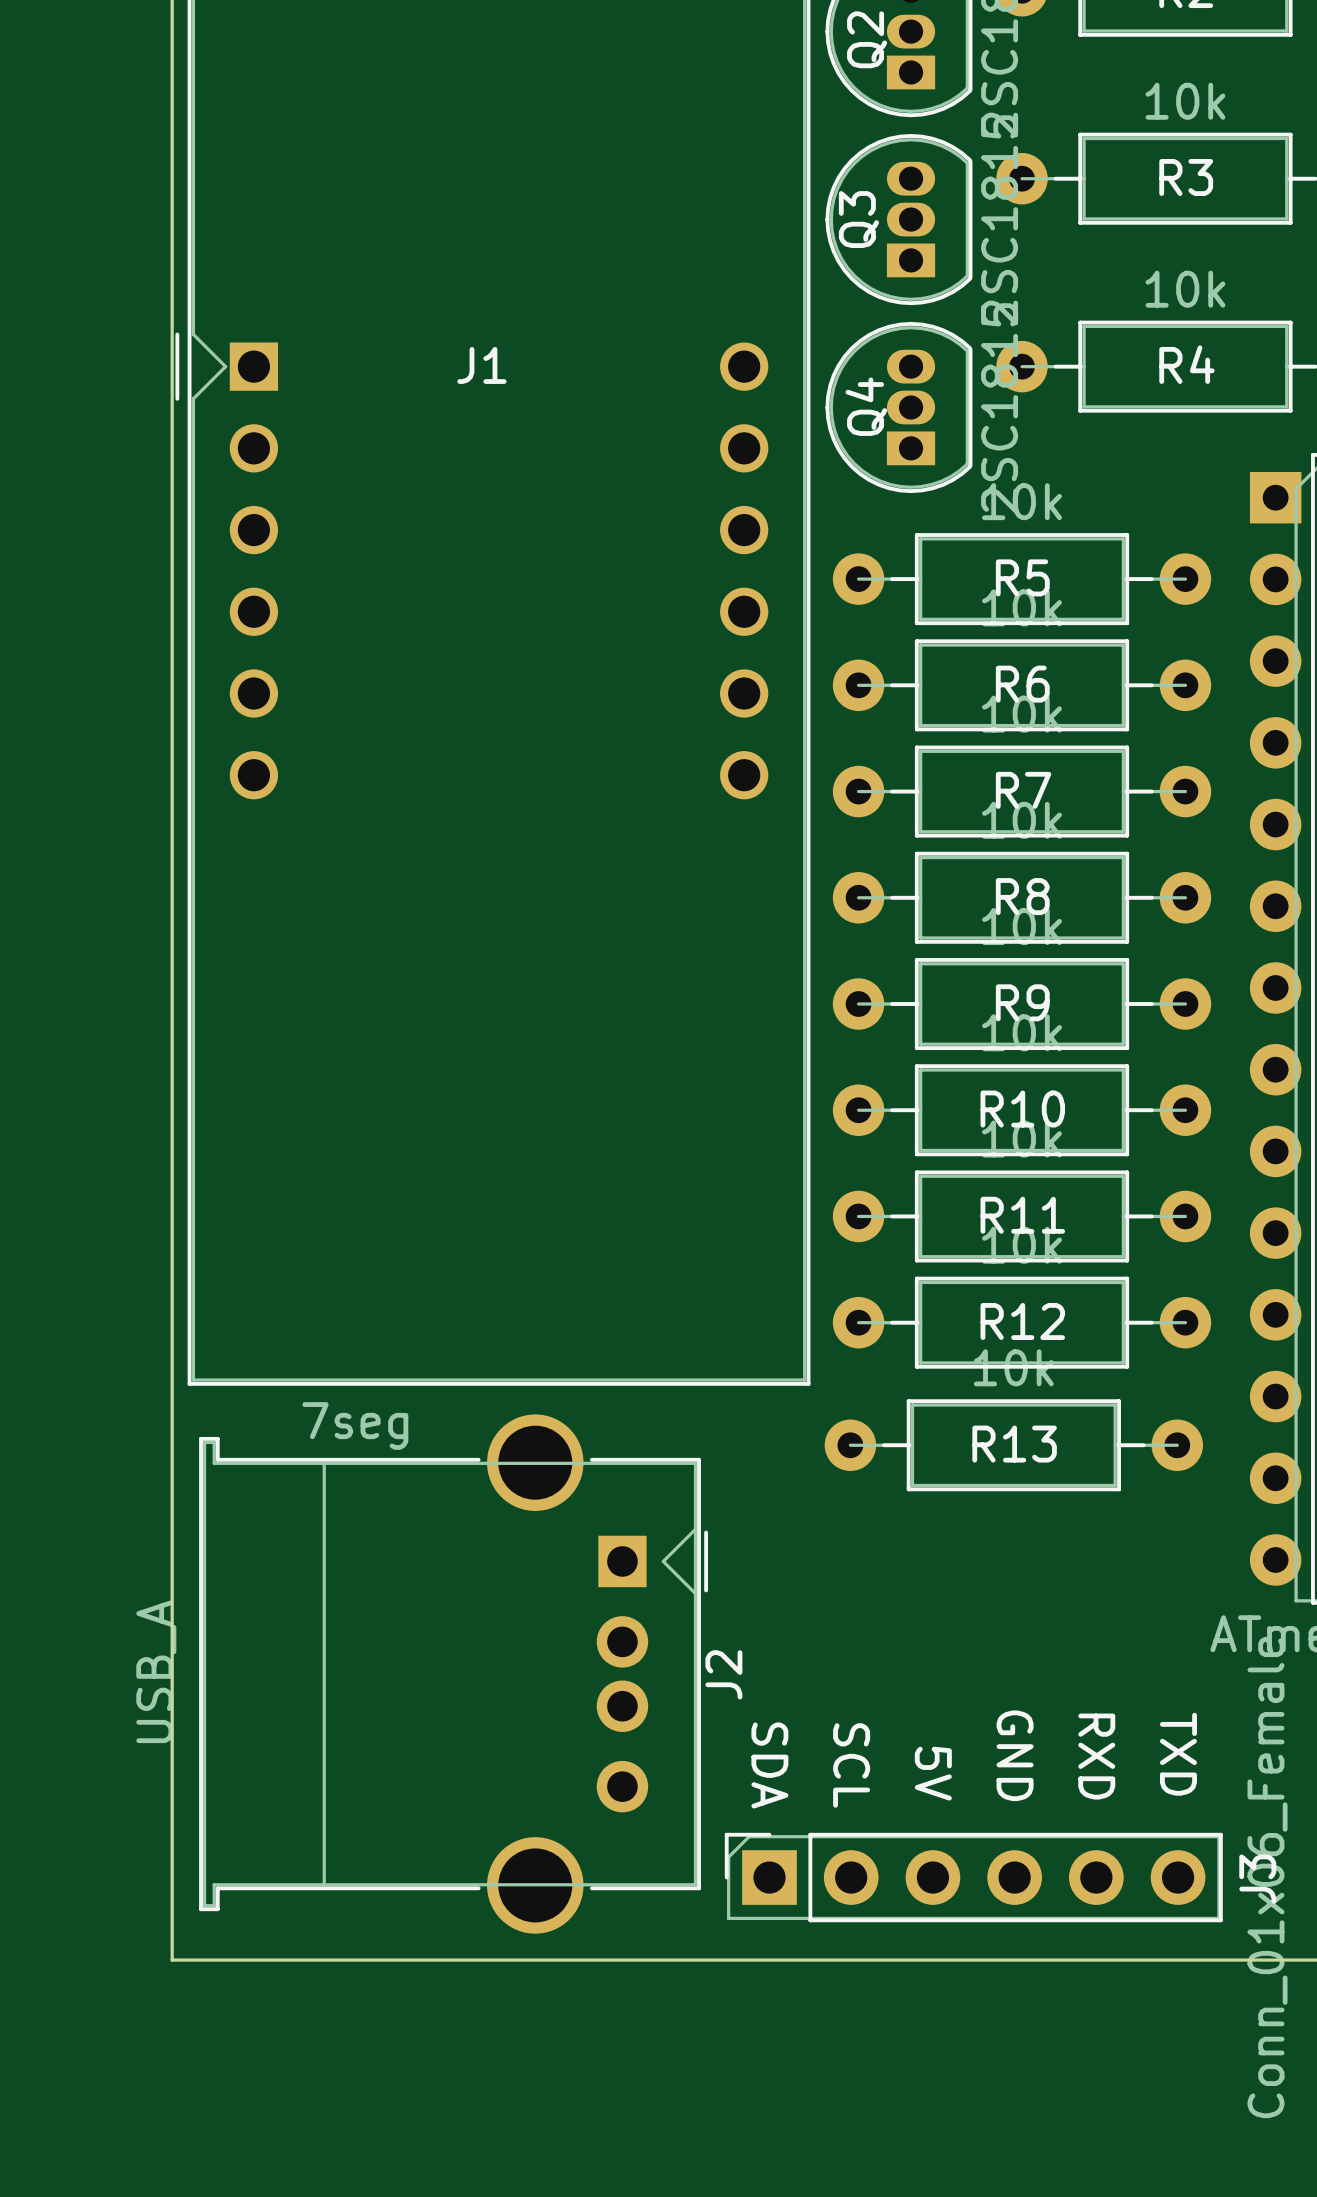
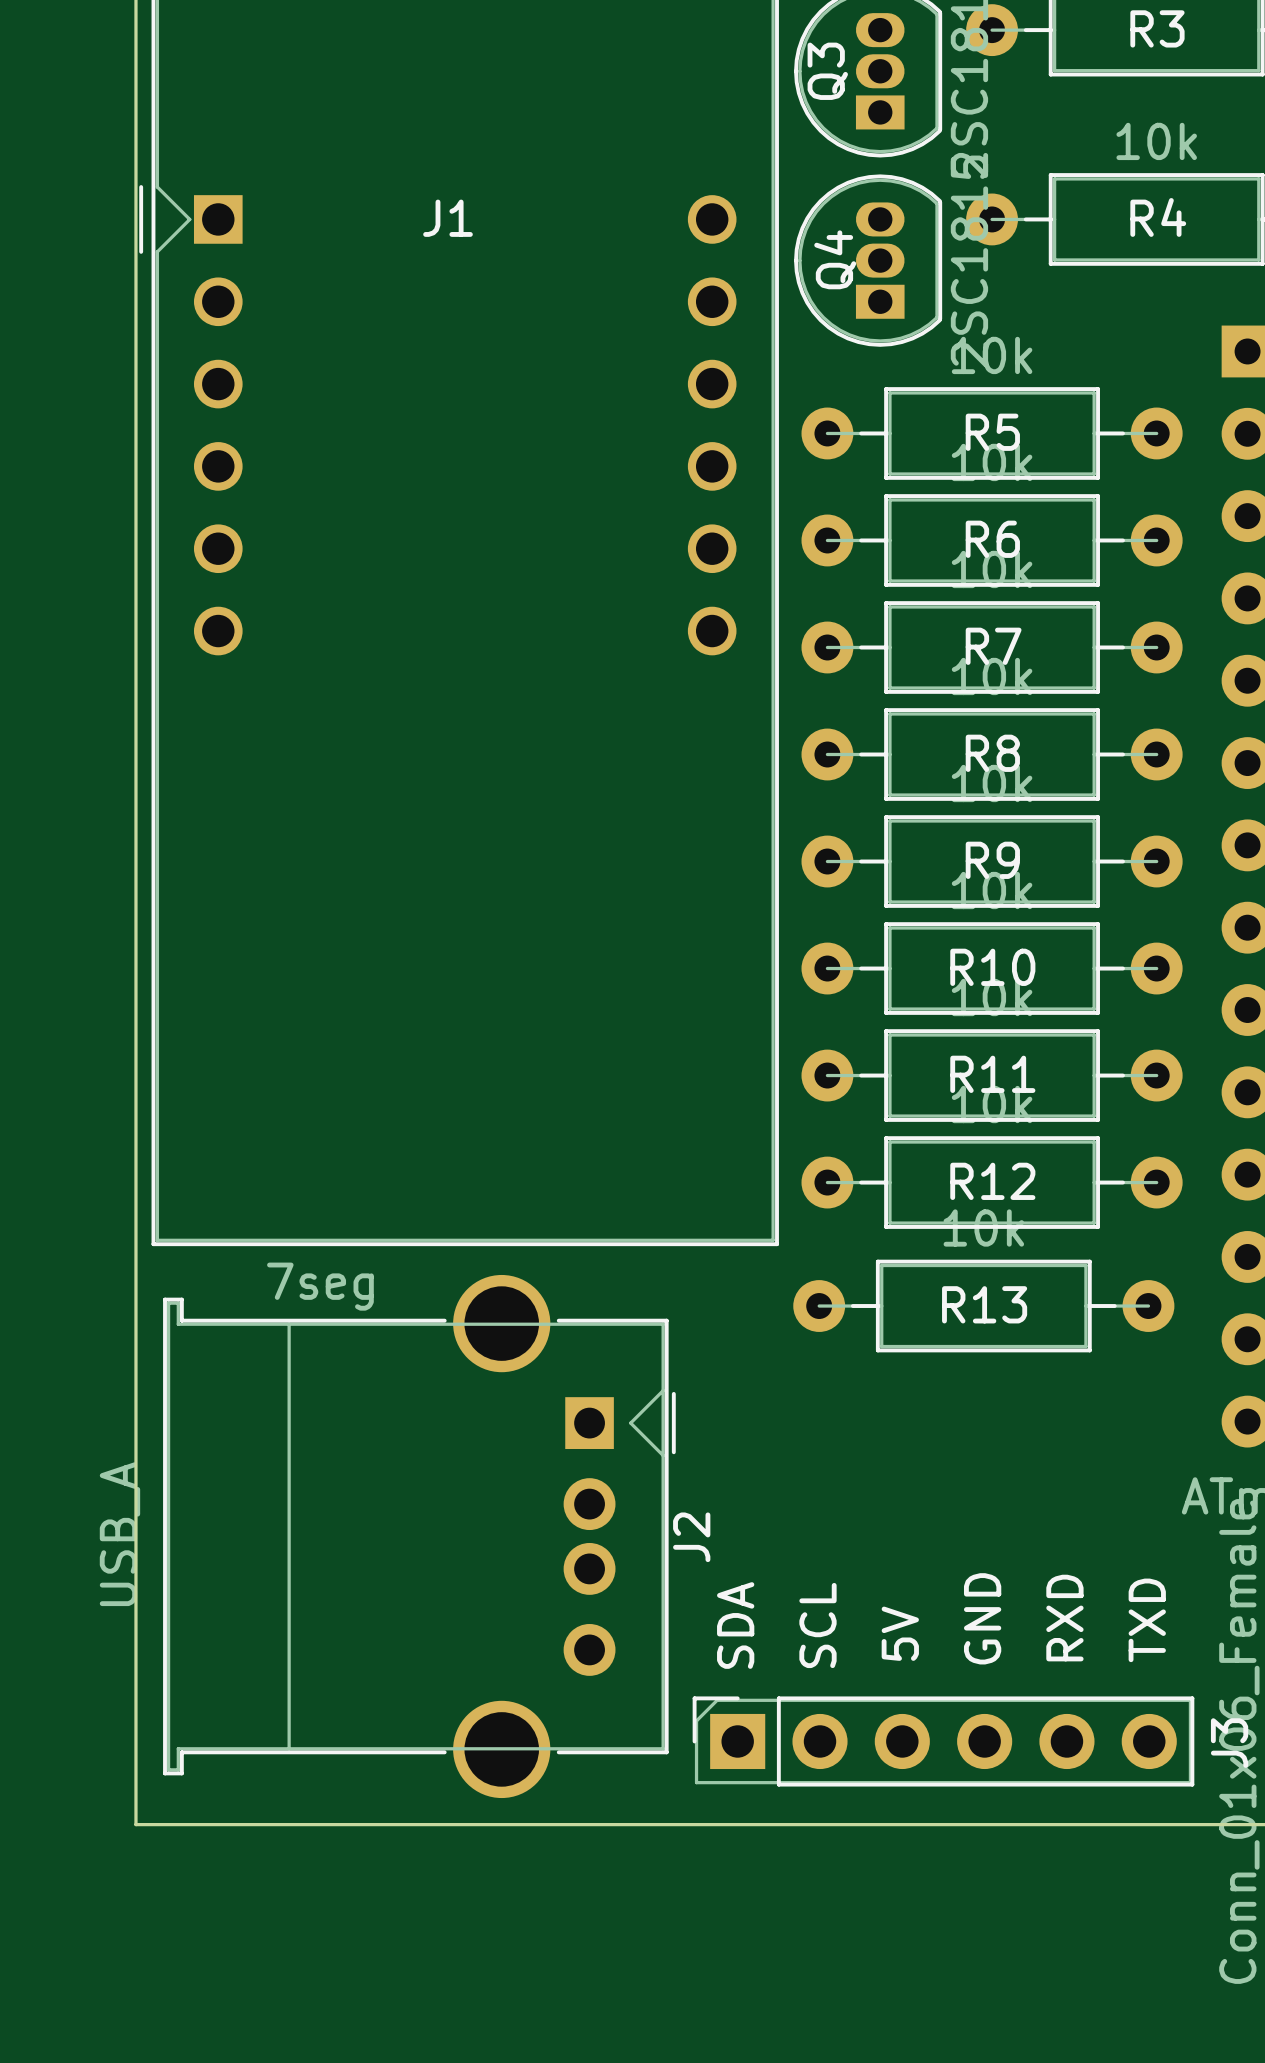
text rotation: 0° (1178, 1754) -> 180° (1147, 1620)
text rotation: 0° (1015, 1755) -> 180° (982, 1618)
text rotation: 0° (1096, 1756) -> 180° (1064, 1618)
text rotation: 0° (769, 1765) -> 180° (735, 1625)
text rotation: 0° (851, 1765) -> 180° (817, 1625)
text rotation: 0° (933, 1773) -> 180° (900, 1633)

